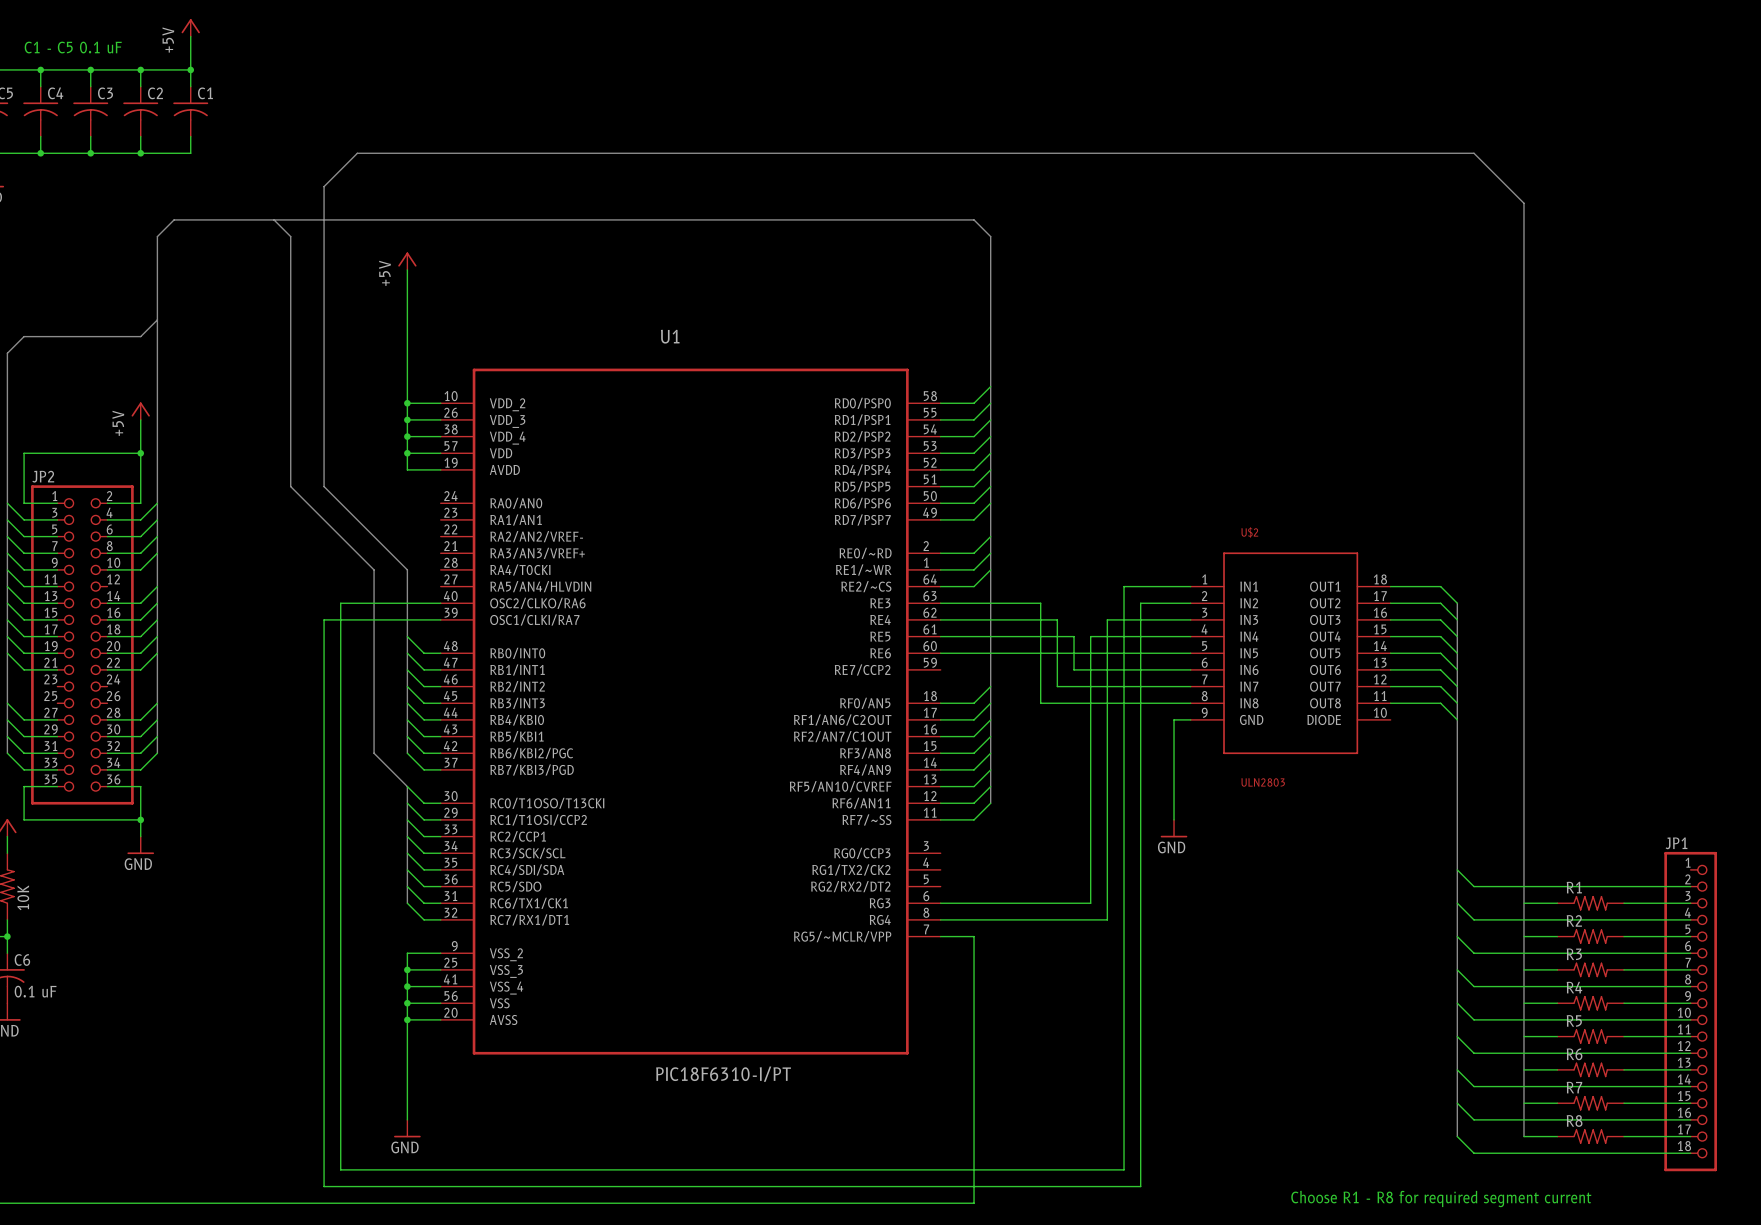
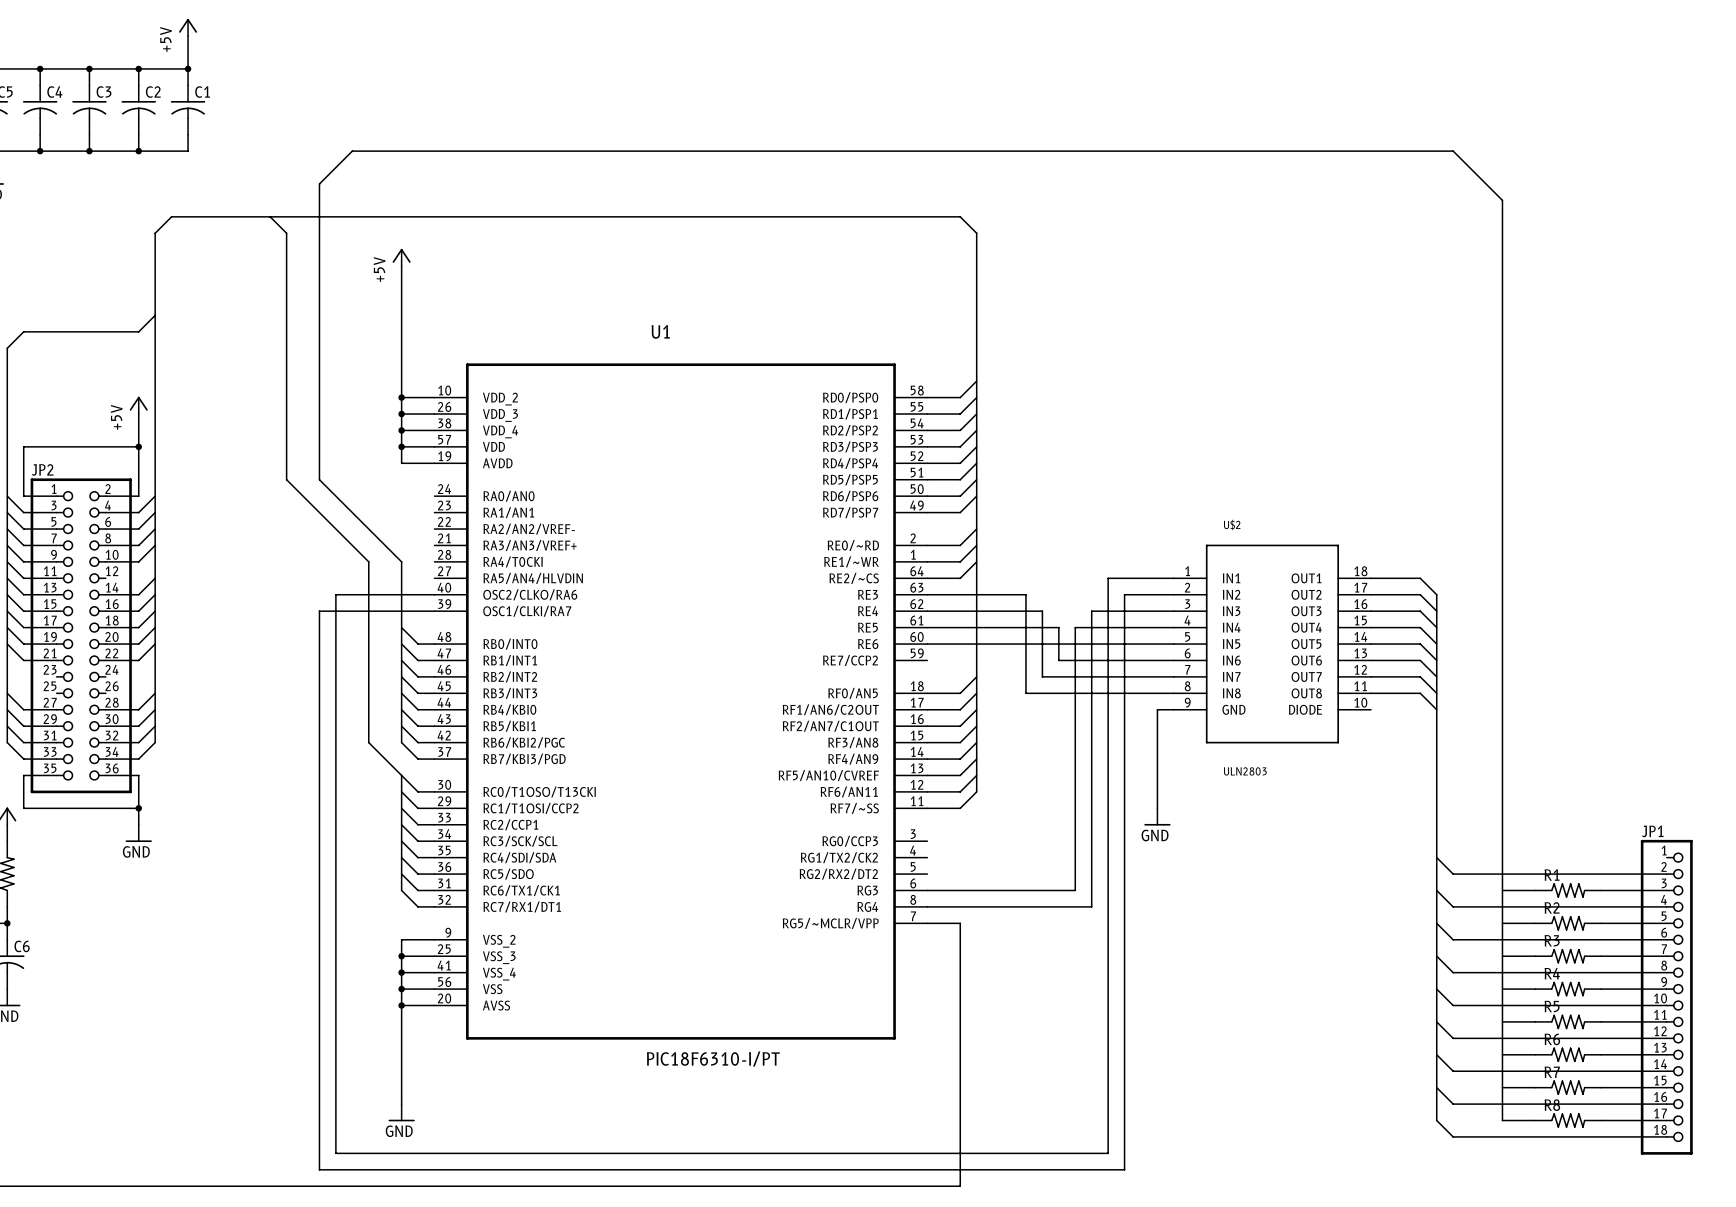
text: C1 - C5 0.1 uF (73, 47) -> none
part value: 10K (23, 897) -> none
C6 value: 0.1 uF (35, 991) -> none
text: Choose R1 - R8 for required segment current (1441, 1199) -> none

